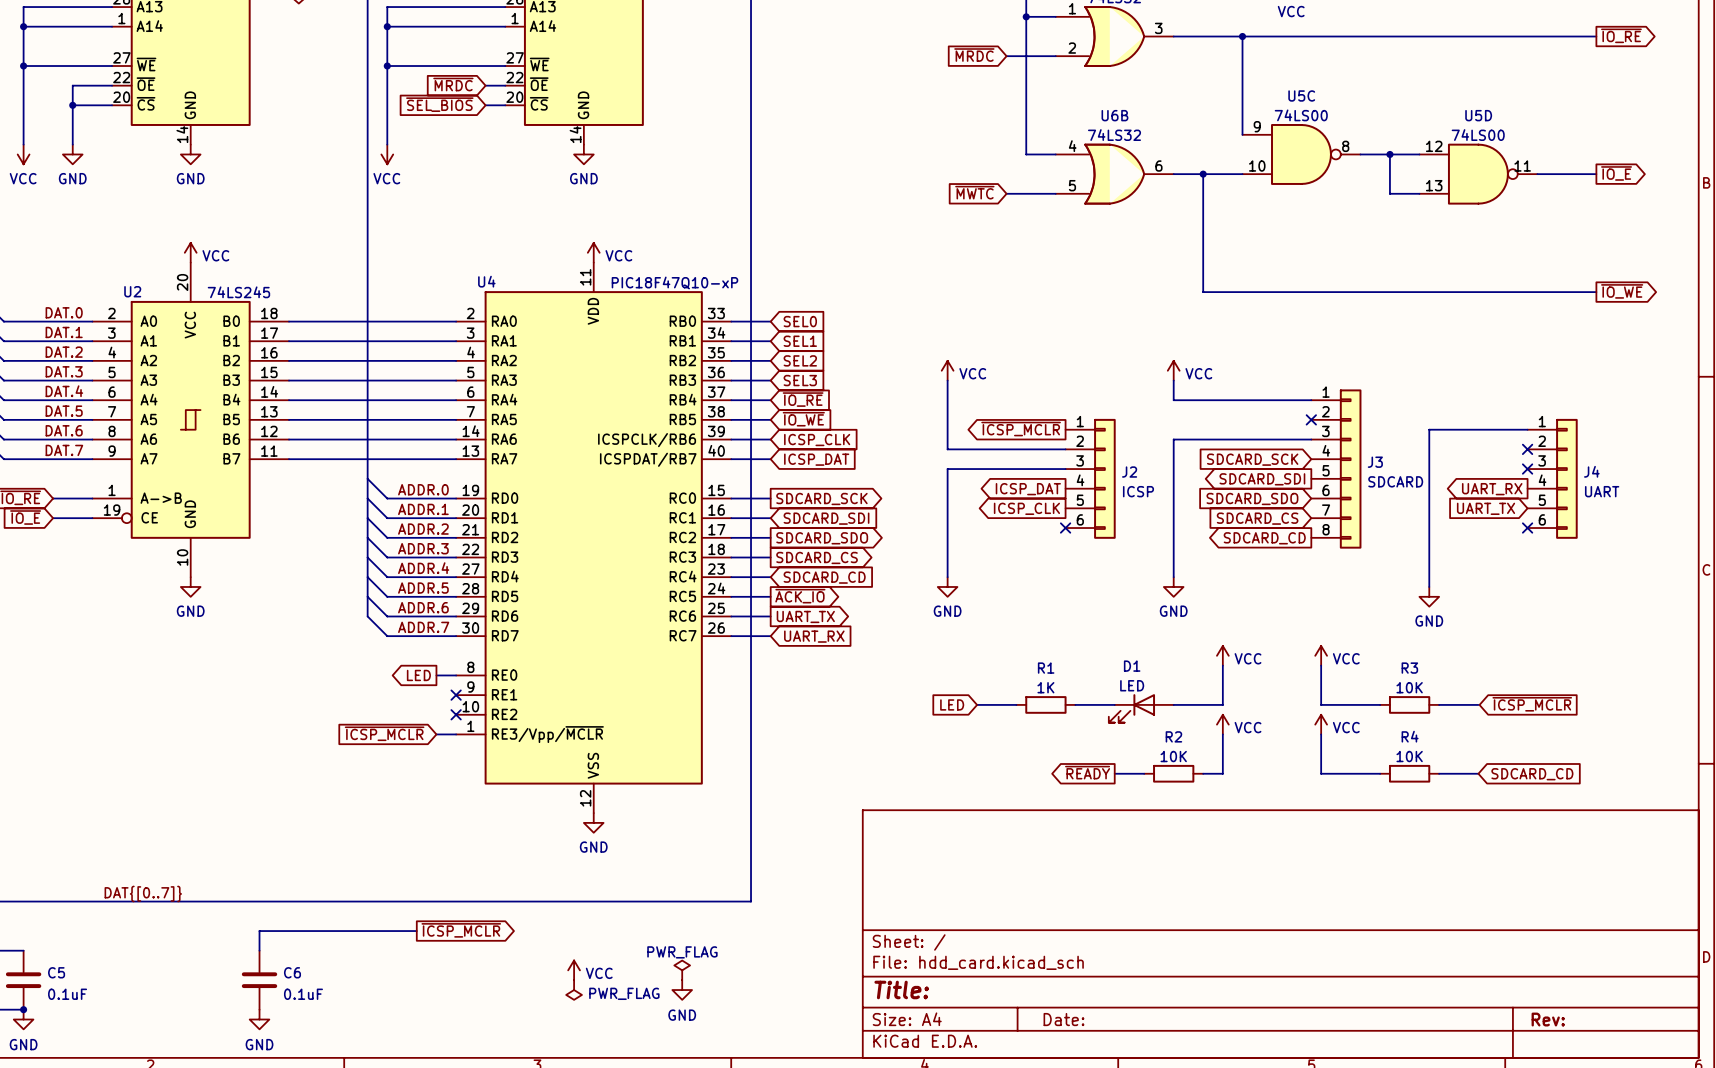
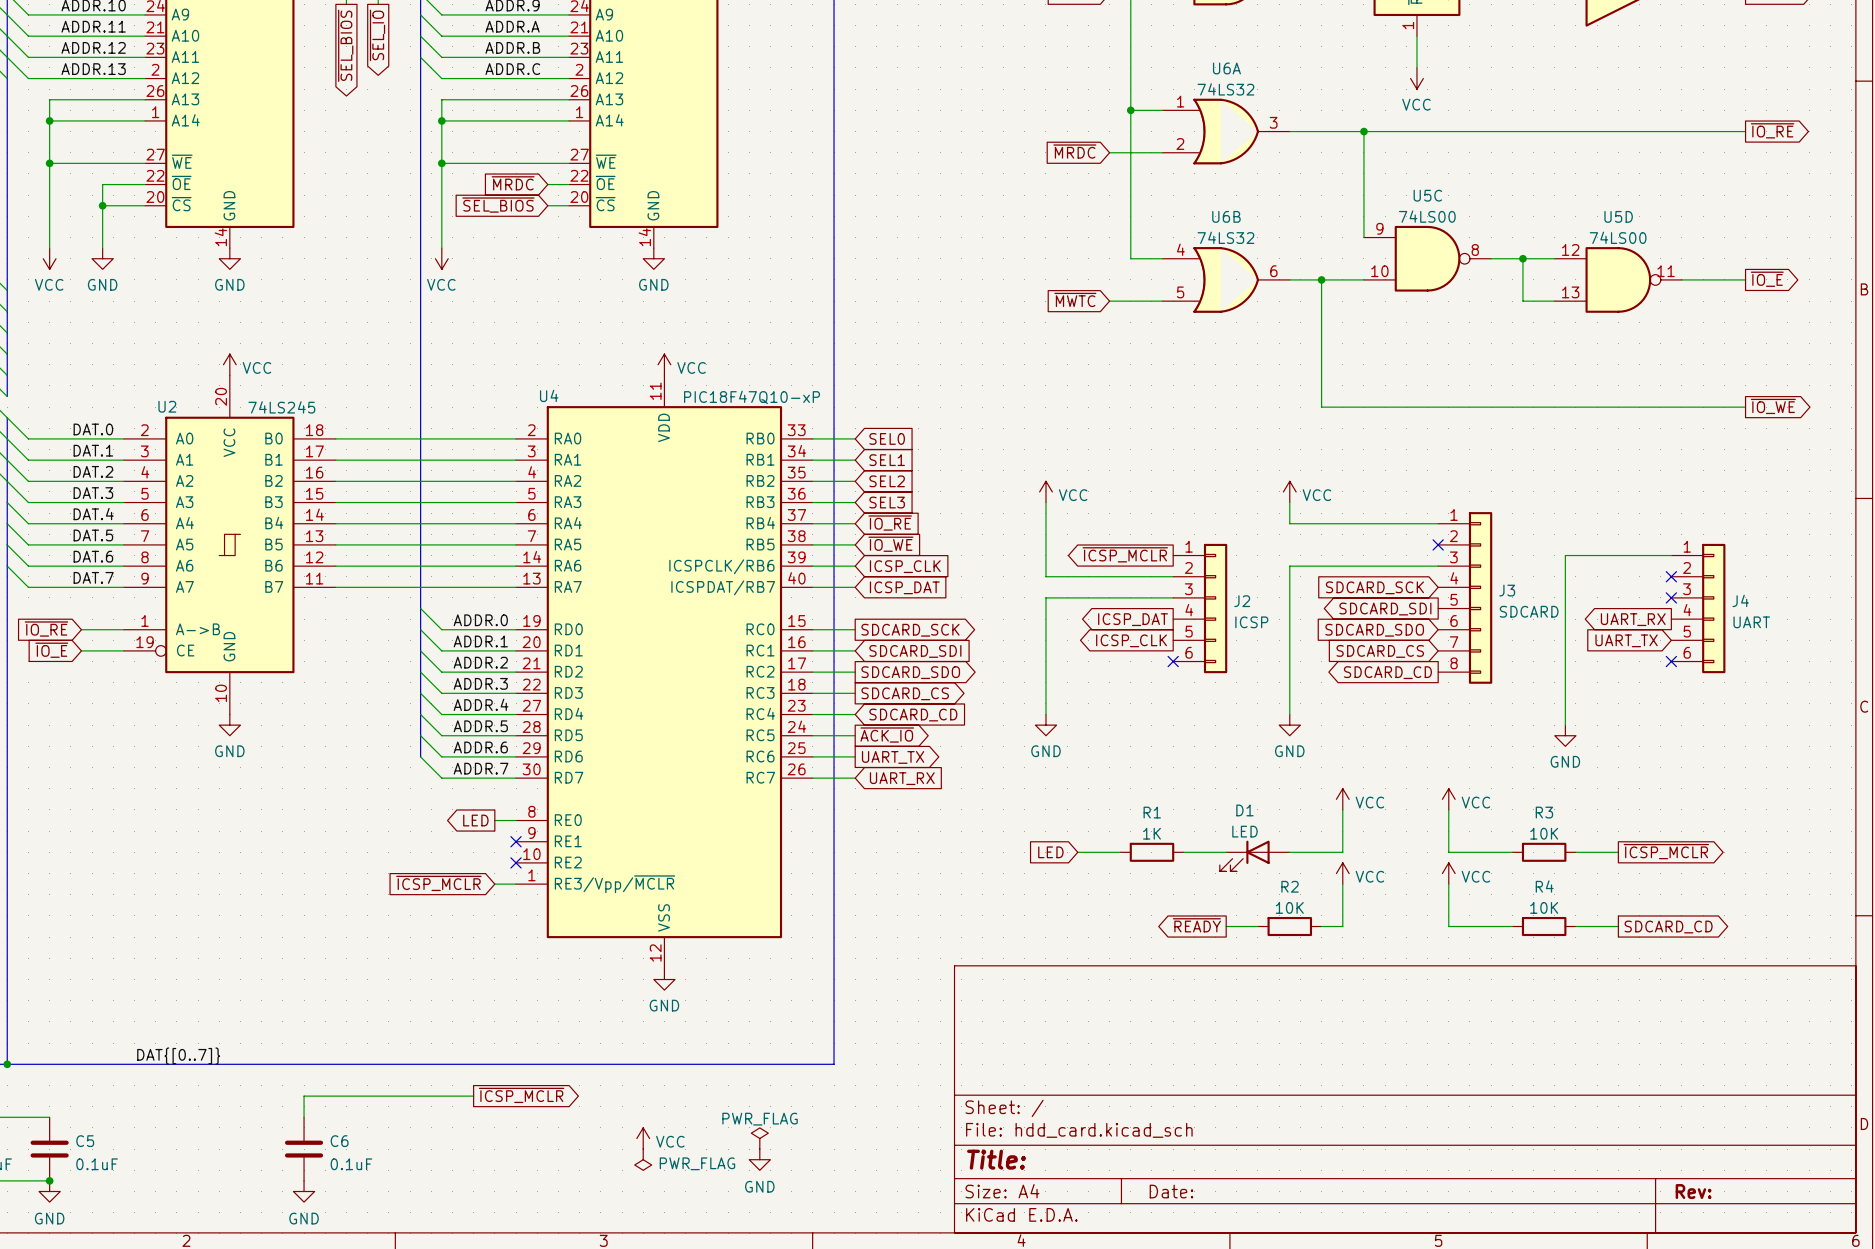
global label rotation: 0° (1532, 704) -> 180° (1666, 851)
global label shape: input (1532, 774) -> output (1668, 927)

